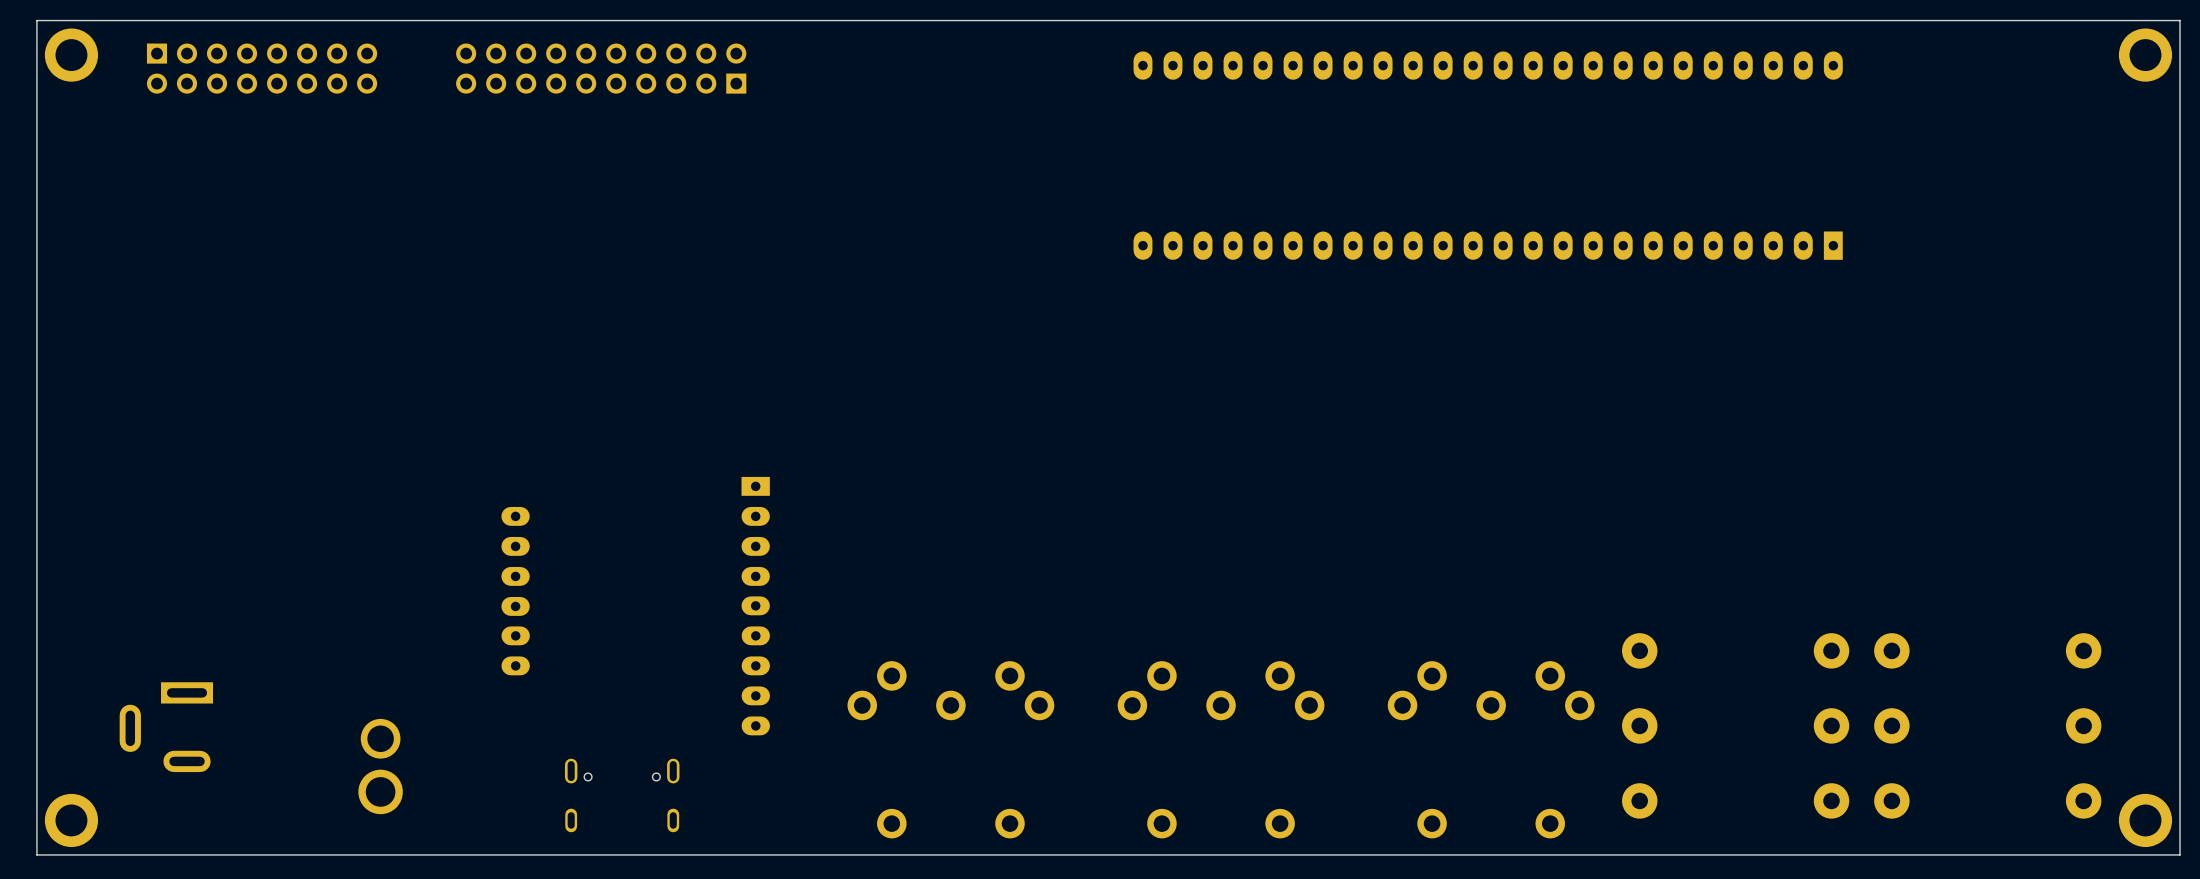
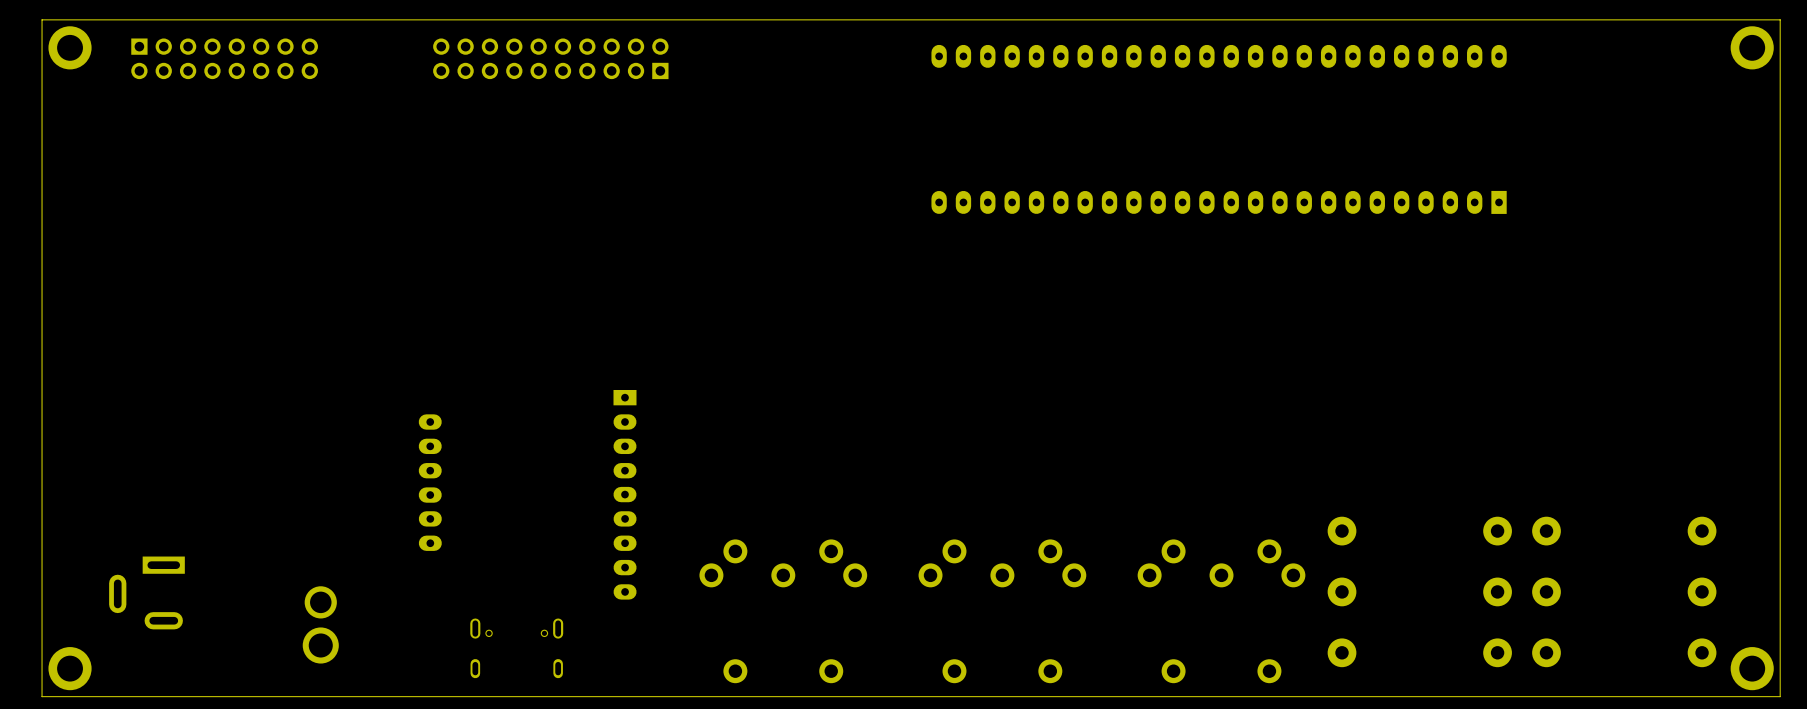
part position: (601, 68) -> (550, 58)

